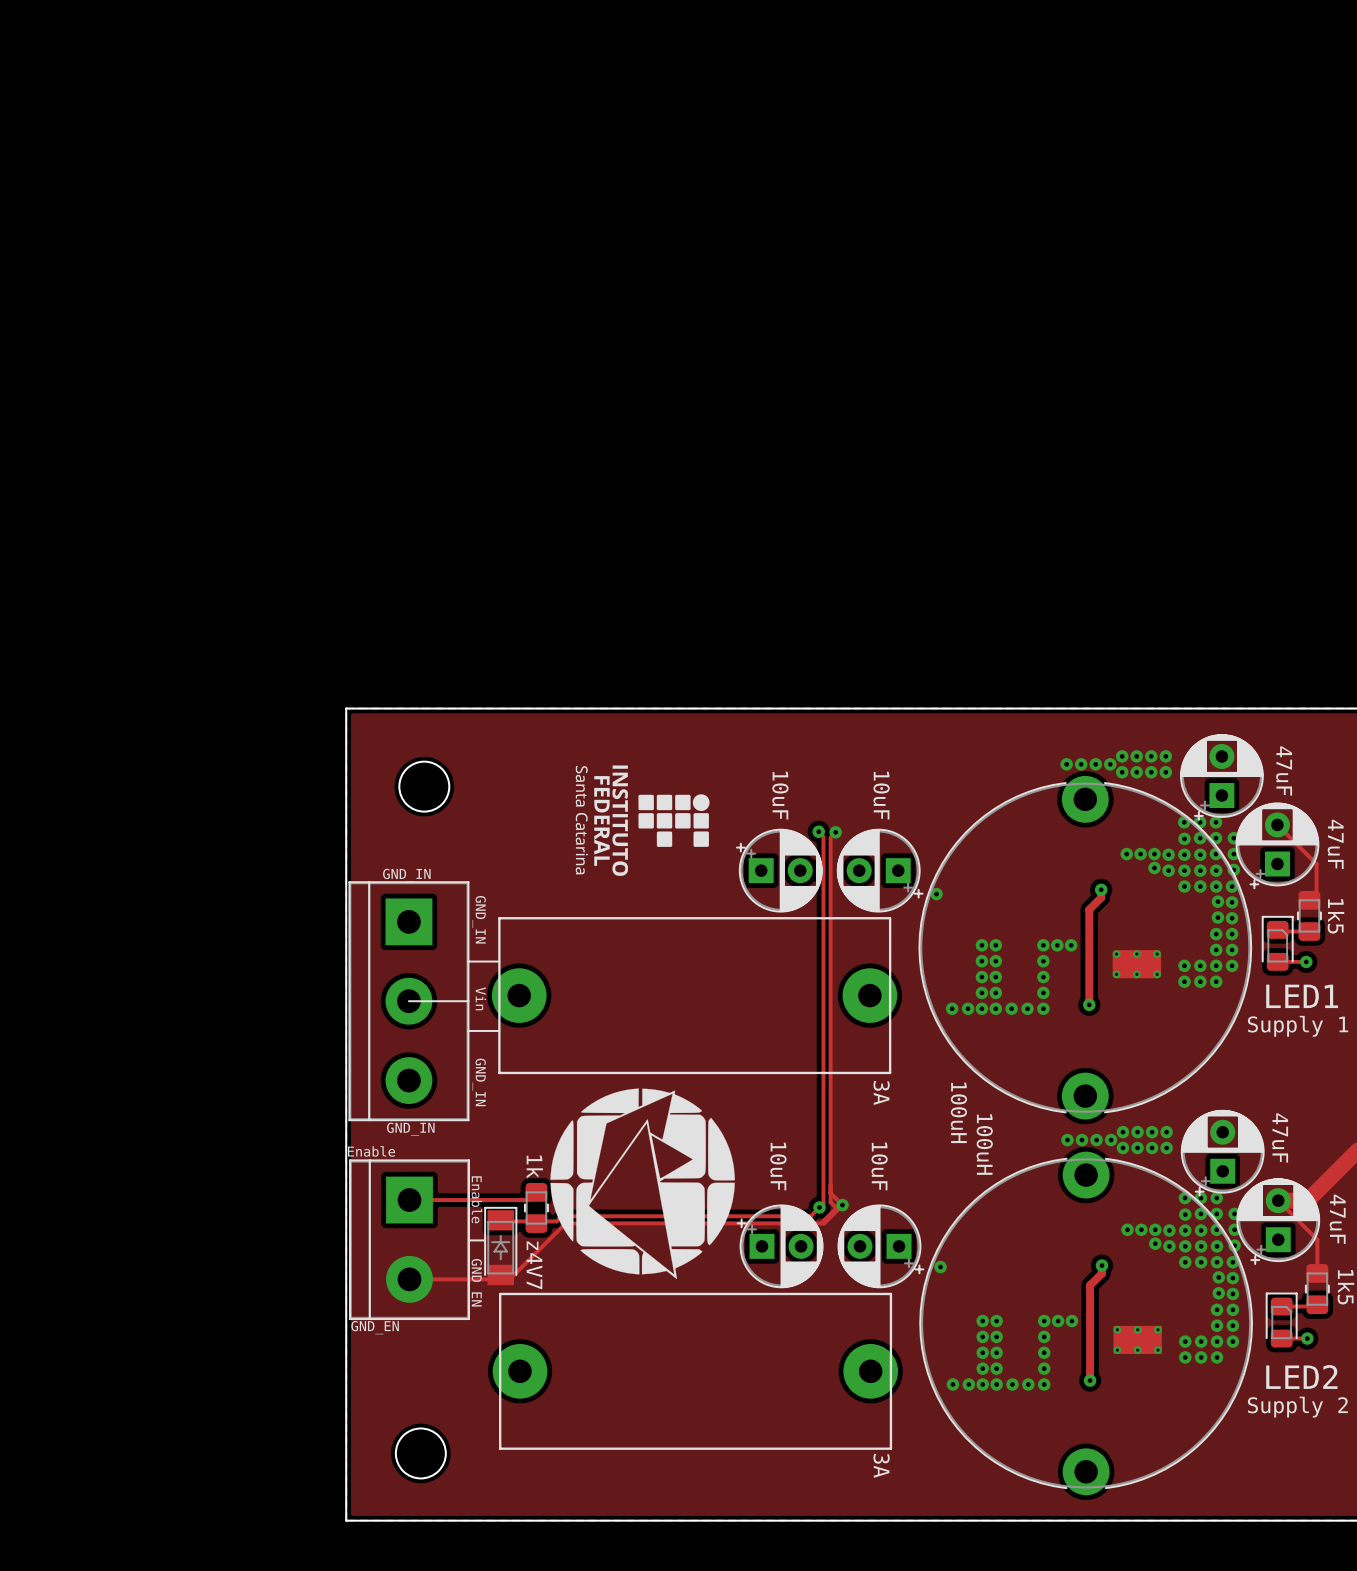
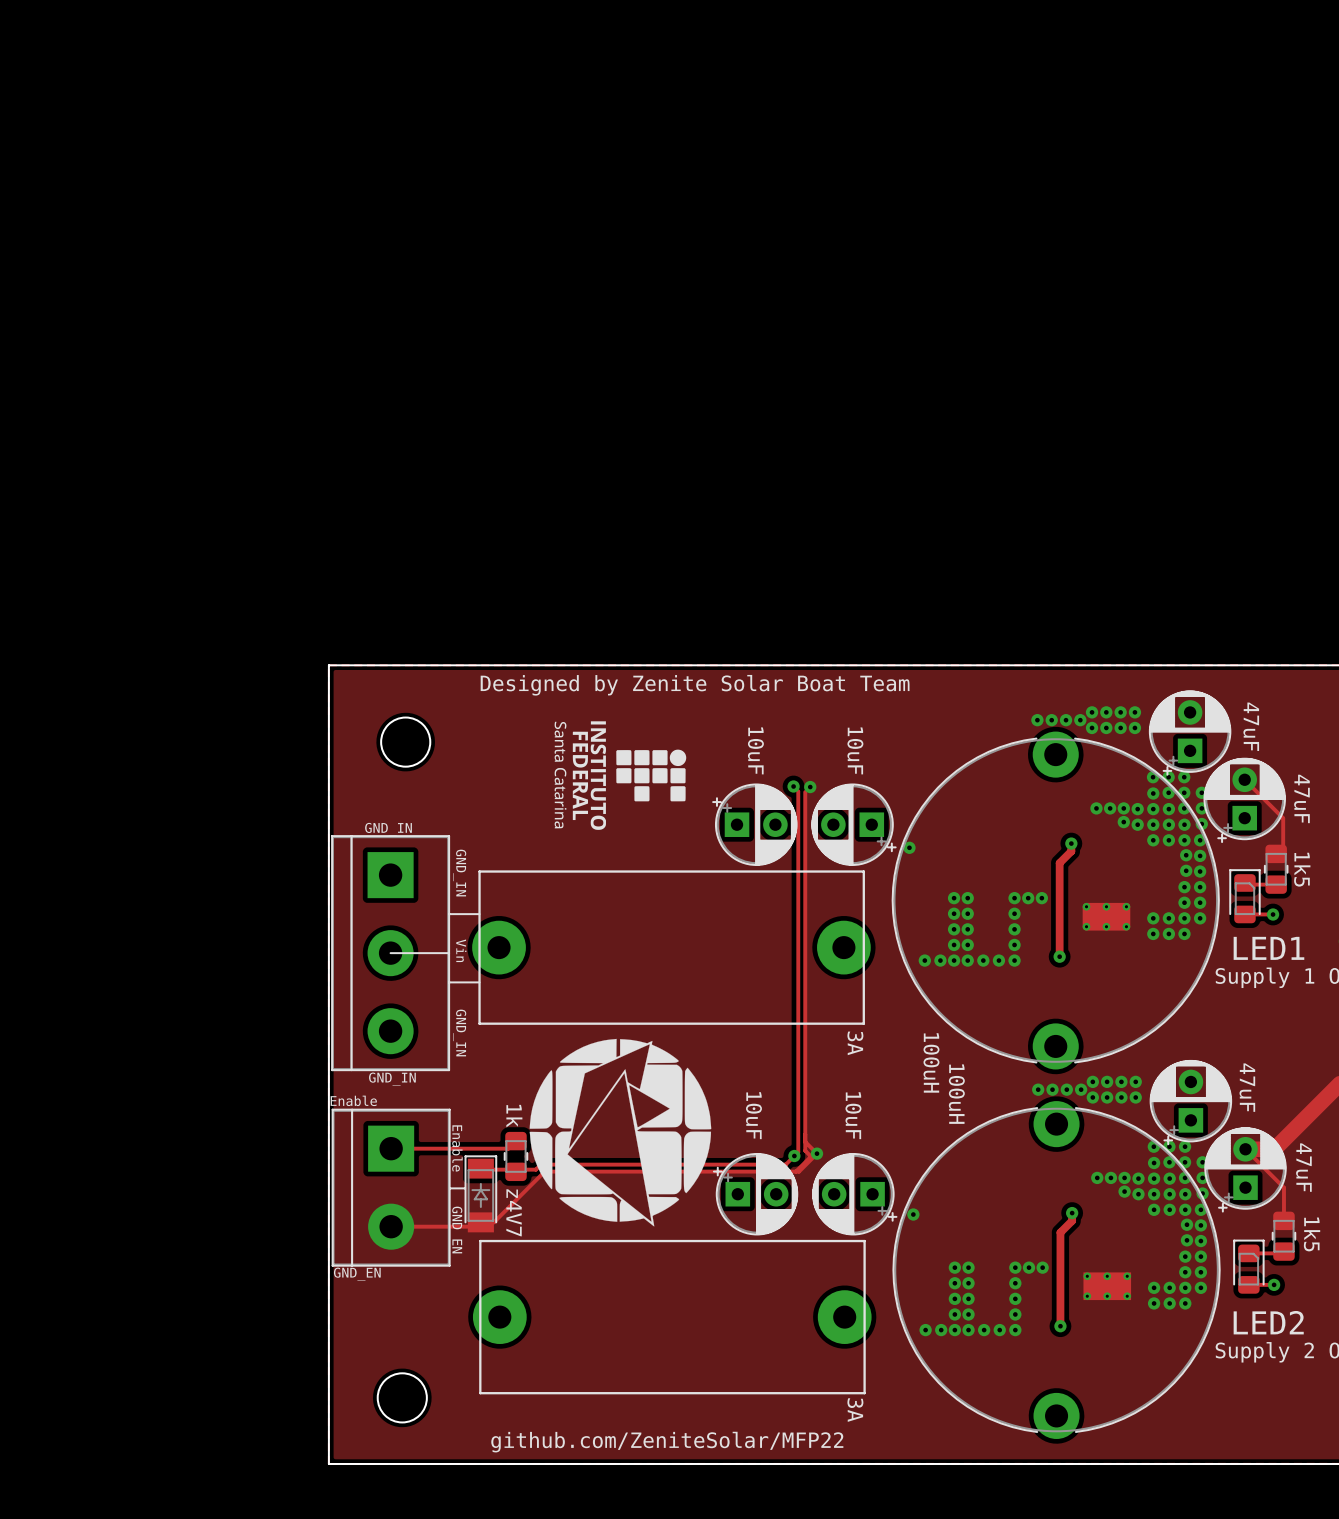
text: none -> Designed by Zenite Solar Boat Team (695, 685)
text: none -> github.com/ZeniteSolar/MFP22 (667, 1442)

